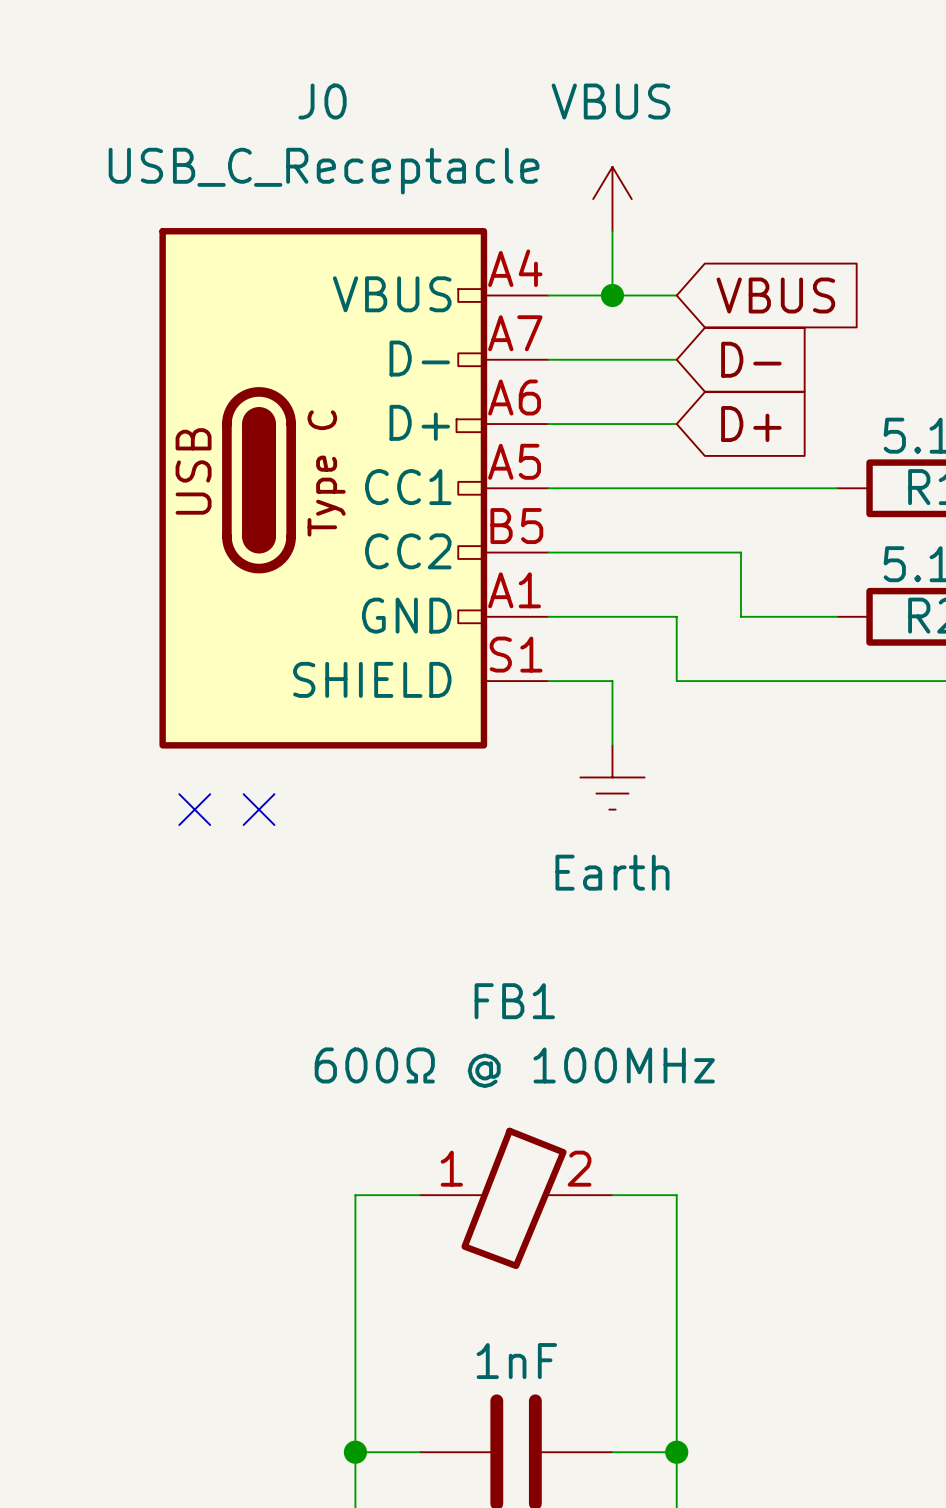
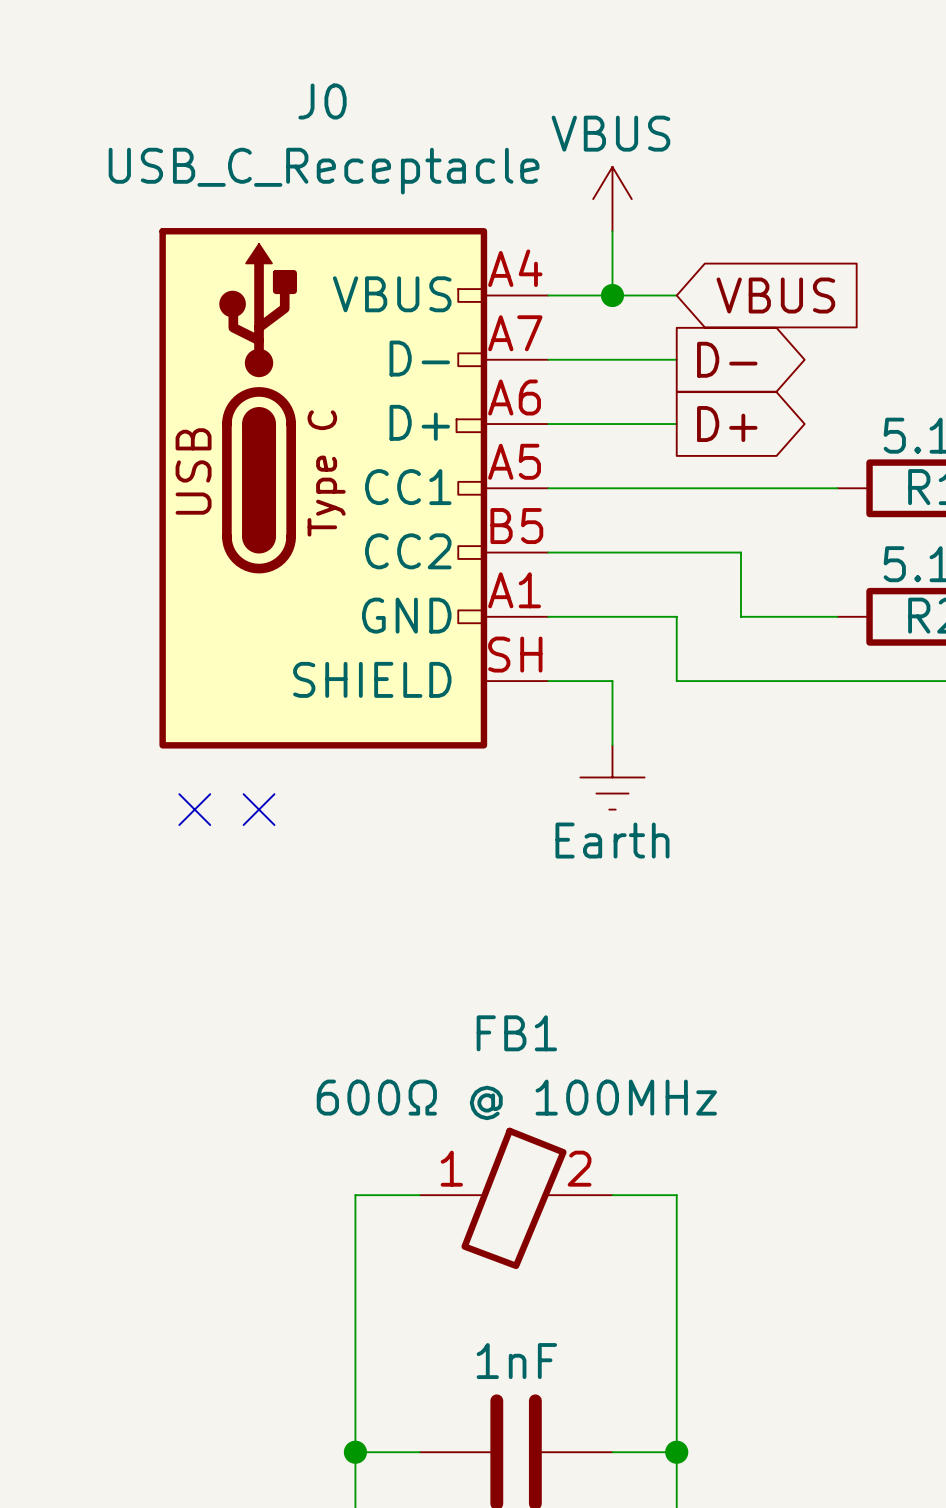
power symbol text position: VBUS (610, 101) -> VBUS (610, 133)
J0 symbol: [159, 228, 549, 749] -> [159, 228, 549, 749]
global label shape: input (751, 359) -> output (727, 359)
global label shape: input (751, 424) -> output (727, 424)
power symbol text position: Earth (612, 872) -> Earth (612, 840)
FB1 name position: FB1 (514, 1001) -> FB1 (516, 1033)
FB1 value position: 600Ω @ 100MHz (514, 1067) -> 600Ω @ 100MHz (516, 1099)

